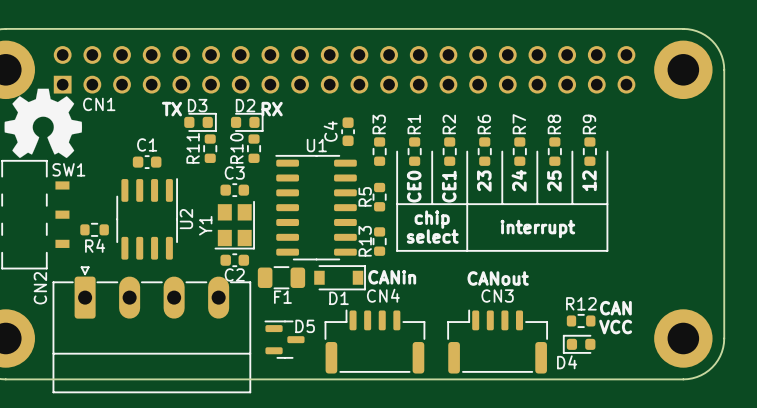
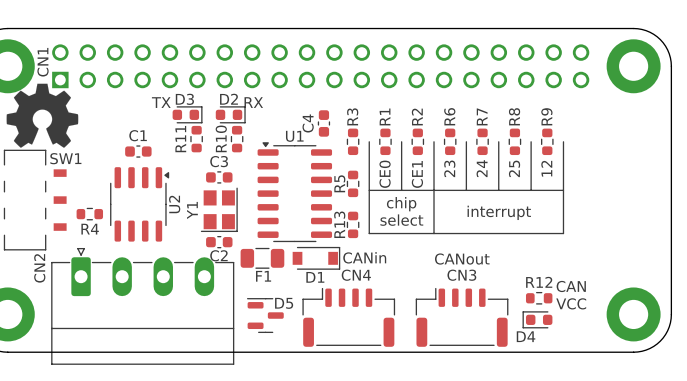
CN1 name rotation: 0° (99, 104) -> 90° counterclockwise (43, 62)
CN1 name position: CN1 (99, 104) -> CN1 (43, 62)
U1 footprint: [275, 155, 357, 261] -> [257, 142, 333, 243]
U2 footprint: [116, 178, 178, 260] -> [110, 167, 170, 242]

